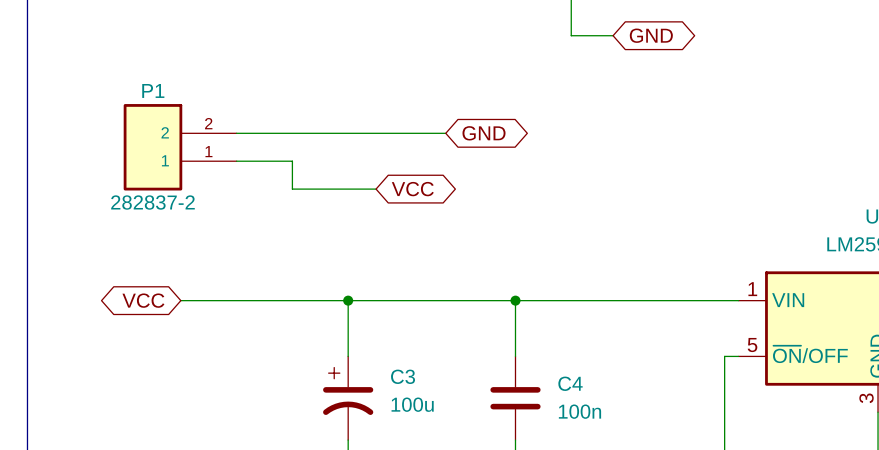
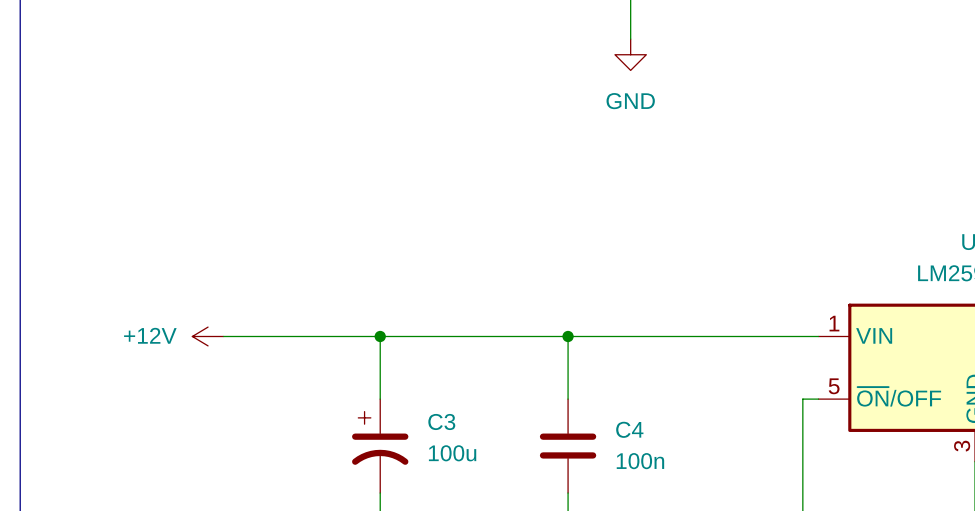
wire: (571, 35) (613, 35) -> none
global label: GND (651, 35) -> none
power symbol: none -> GND (630, 54)
wire: (236, 133) (445, 133) -> none
global label: GND (484, 133) -> none
P1: 282837-2 (180, 147) -> none
wire: (236, 161) (292, 161) (292, 189) (376, 189) -> none
global label: VCC (412, 189) -> none
global label: VCC (143, 300) -> none
power symbol: none -> +12V (208, 336)

